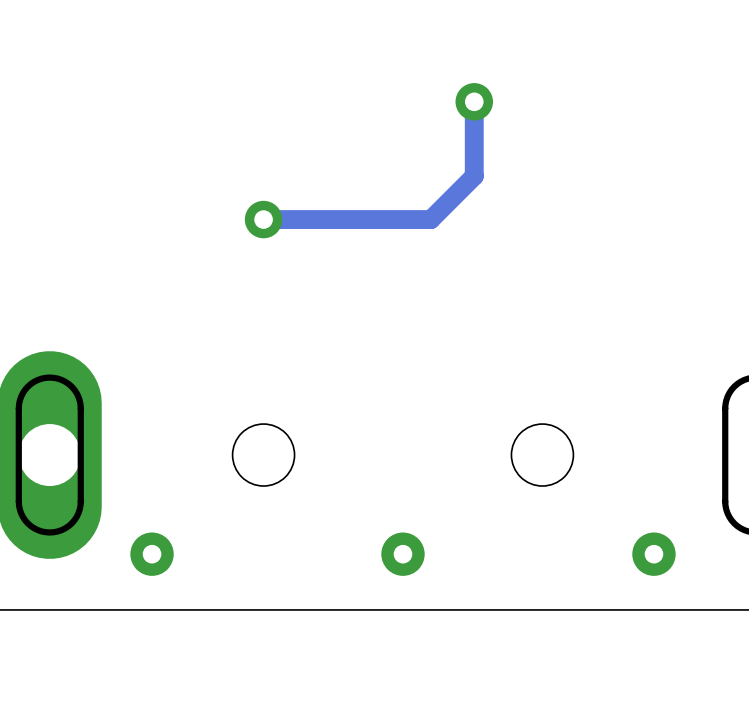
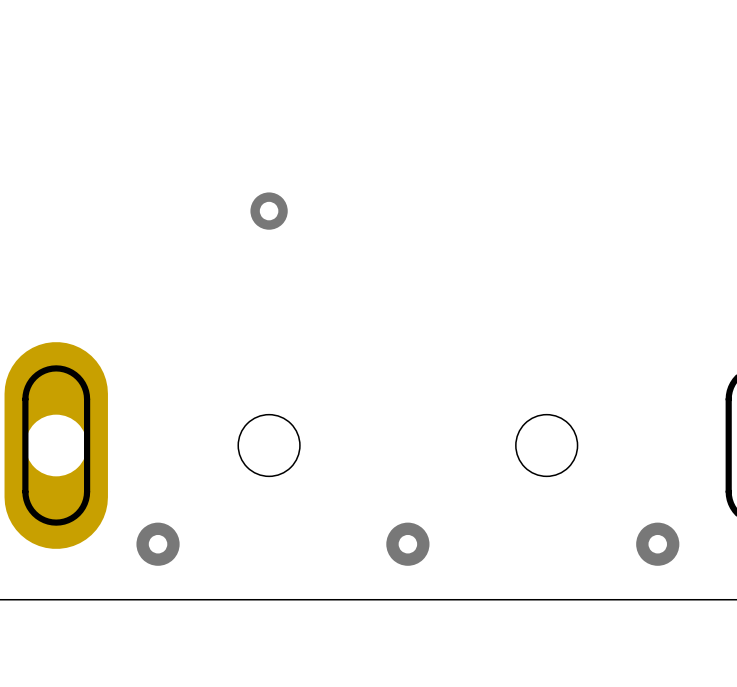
track: (474, 101) (474, 176) (430, 219) (263, 219) -> none
via: (474, 101) -> none

